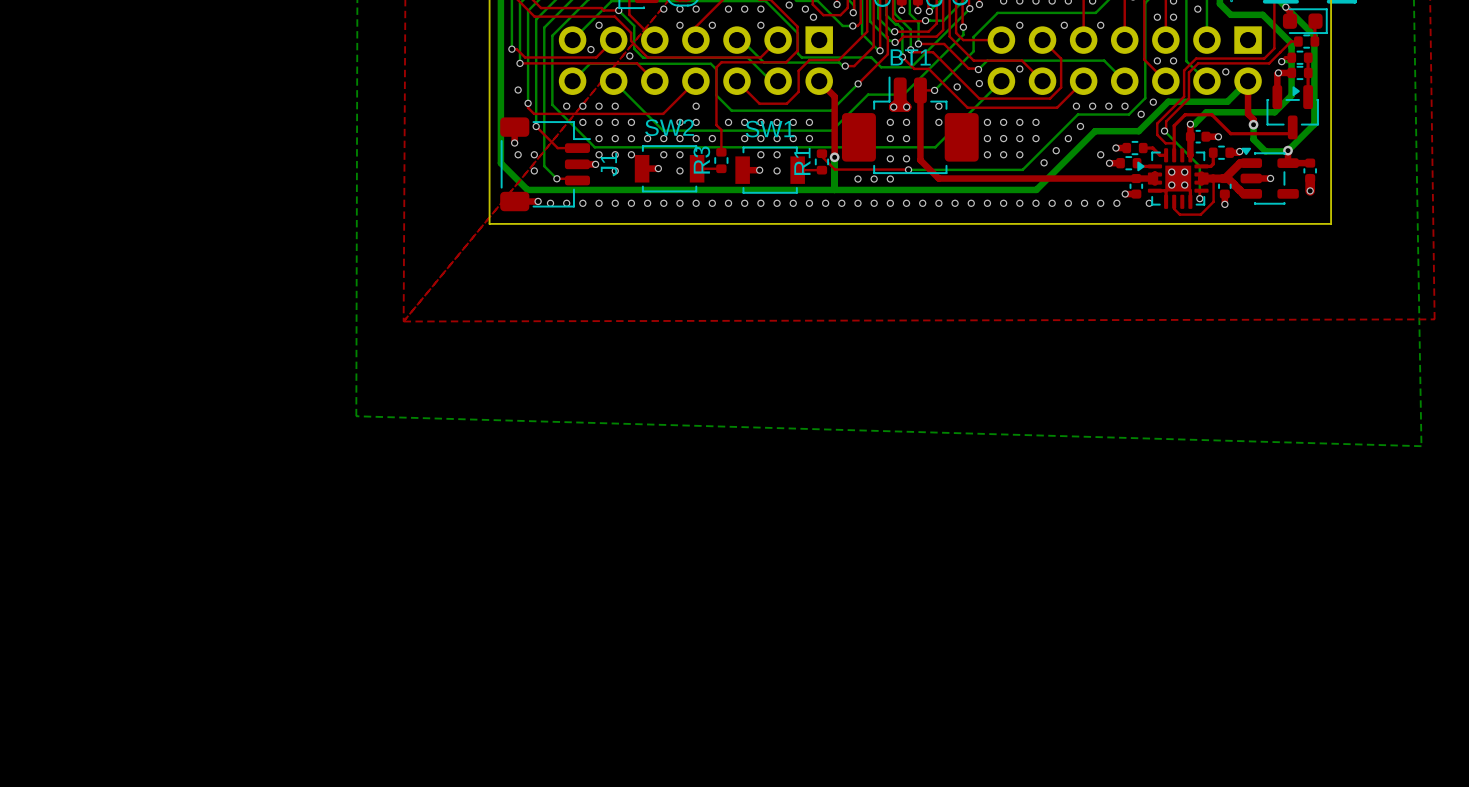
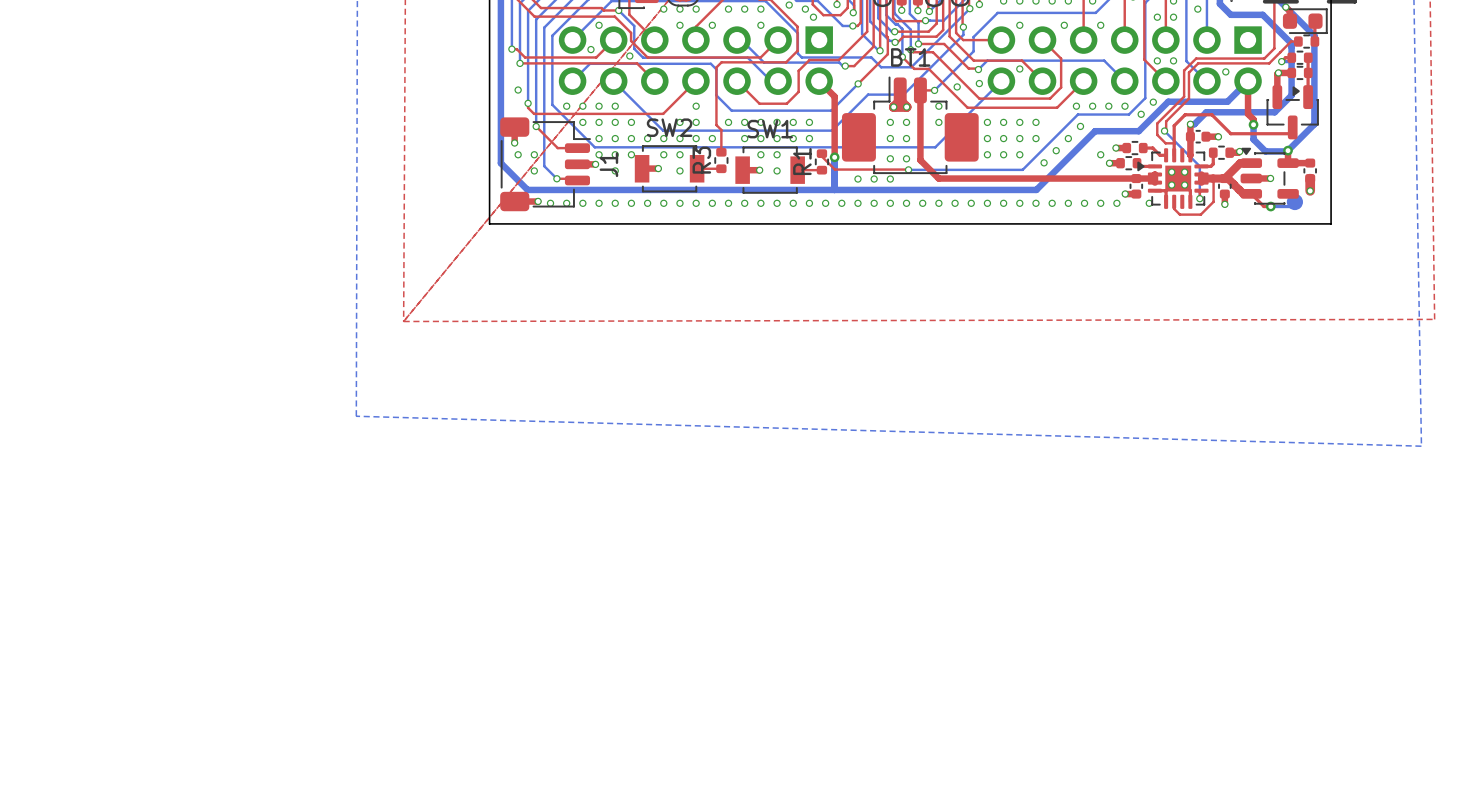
top track: none -> (1251, 193) (1263, 206) (1270, 206)
bottom track: none -> (1294, 202) (1290, 206) (1270, 206)
part: none -> (1294, 202)
via: none -> (1270, 206)

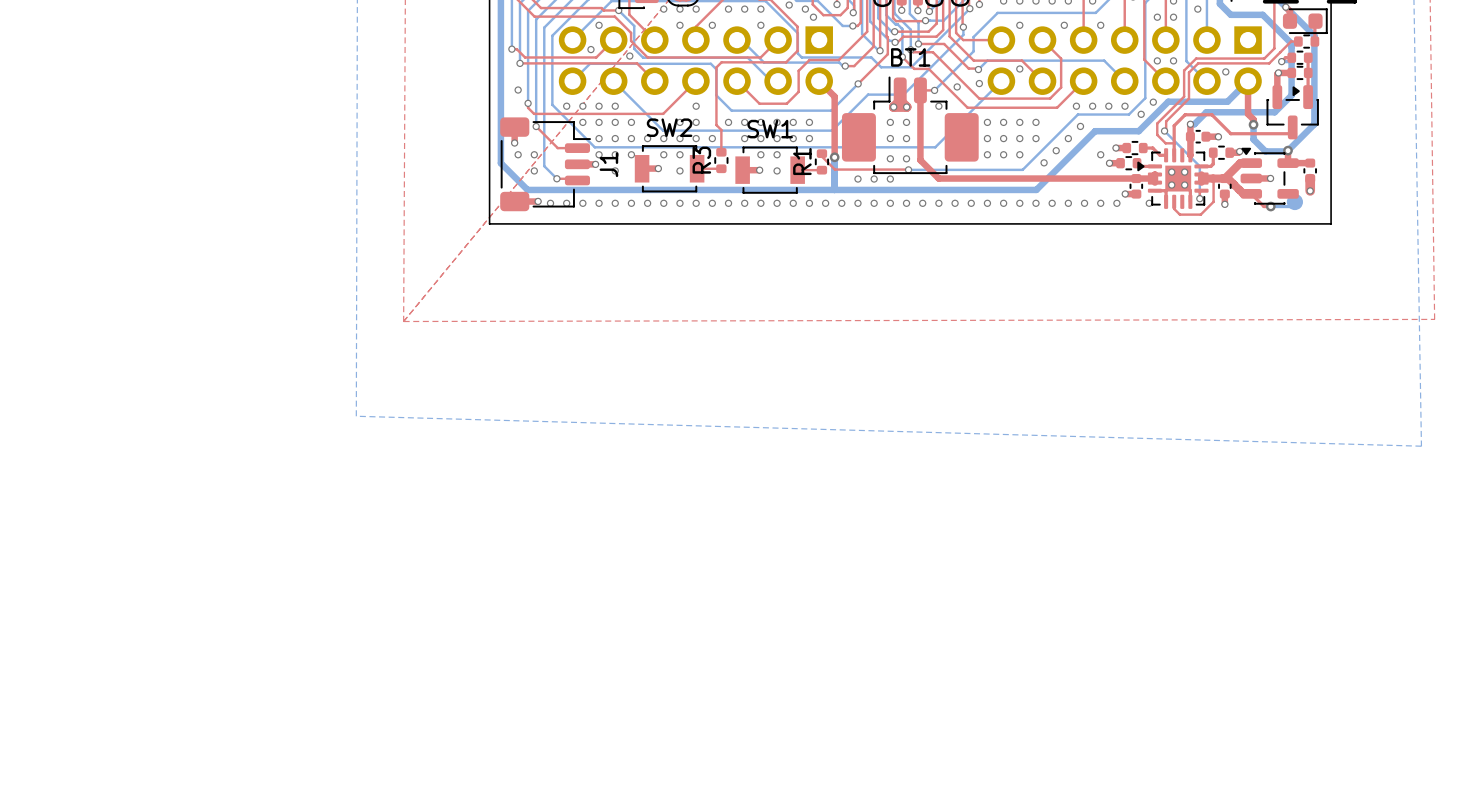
via: (938, 122) -> none

